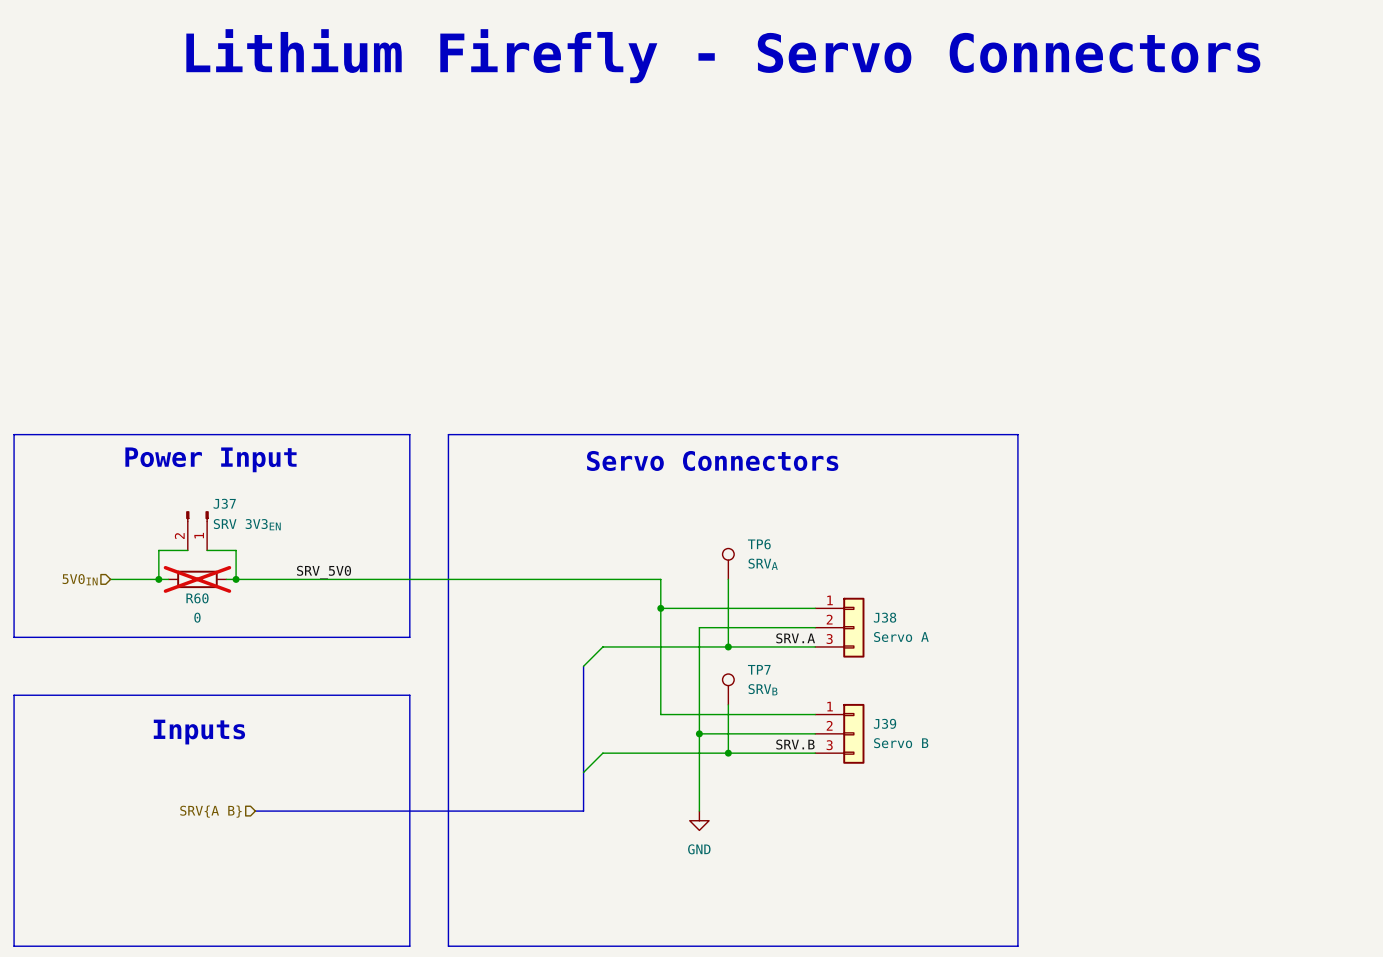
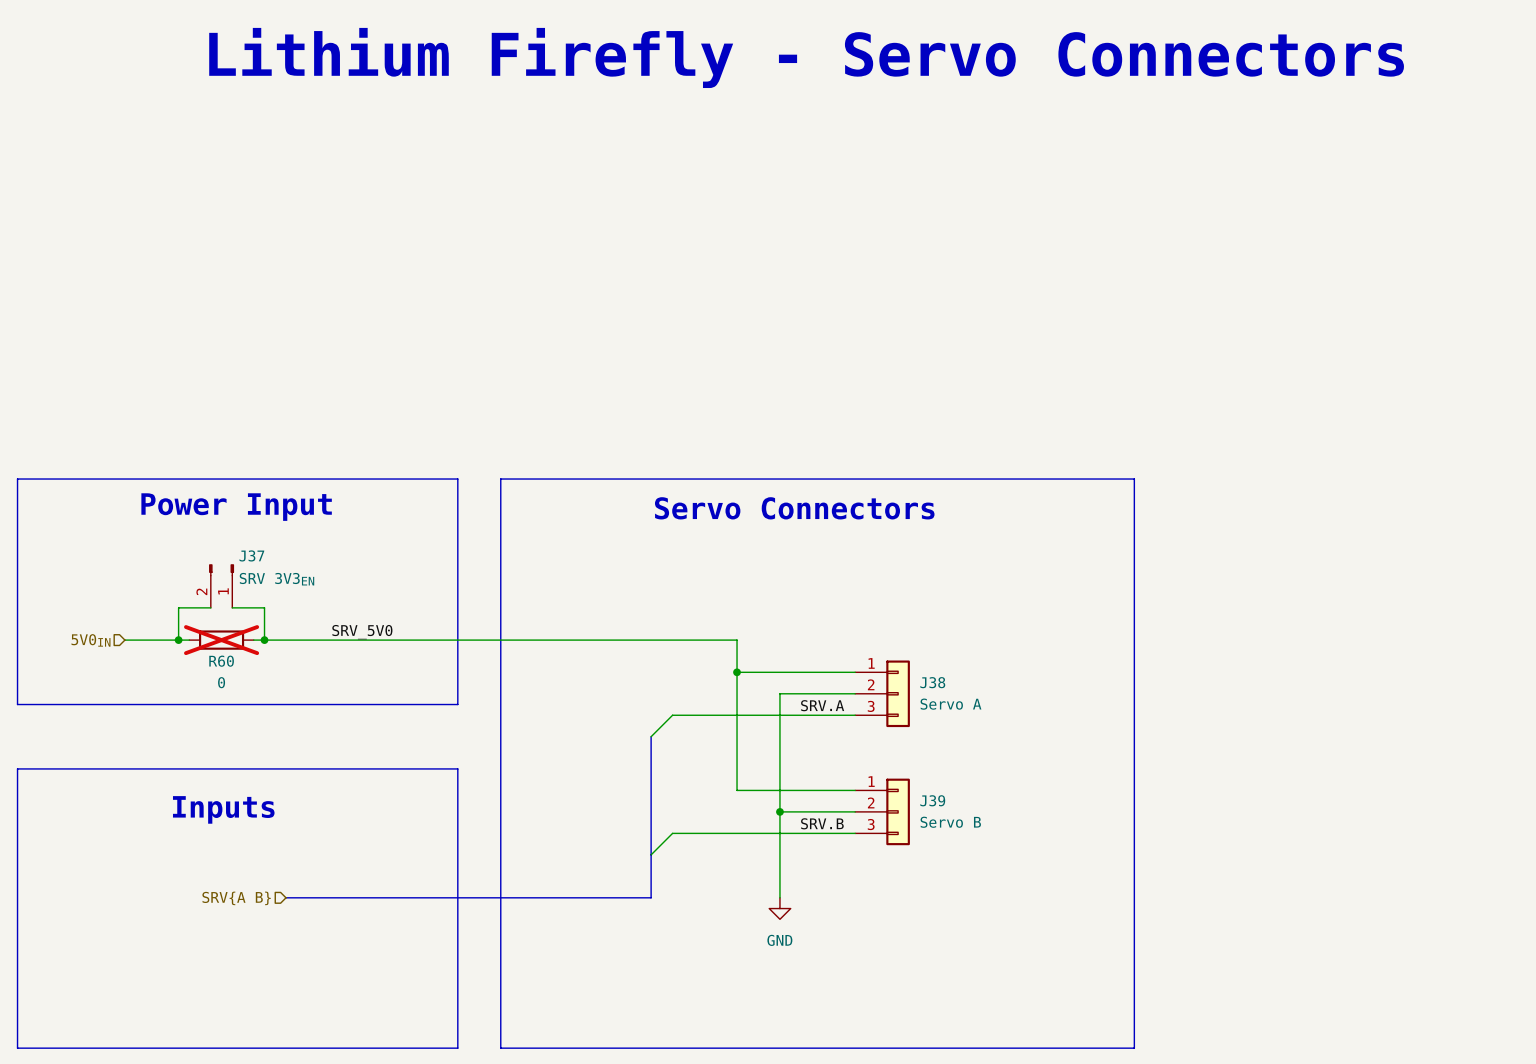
TP6: SRVA (728, 563) -> none
wire: (728, 579) (728, 646) -> none
J38 position: (839, 627) -> (882, 693)
label position: SRV.A (795, 638) -> SRV.A (822, 705)
junction: (728, 646) -> none
TP7: SRVB (728, 689) -> none
wire: (728, 704) (728, 753) -> none
J39 position: (839, 733) -> (882, 811)
label position: SRV.B (795, 744) -> SRV.B (822, 823)
junction: (728, 753) -> none

